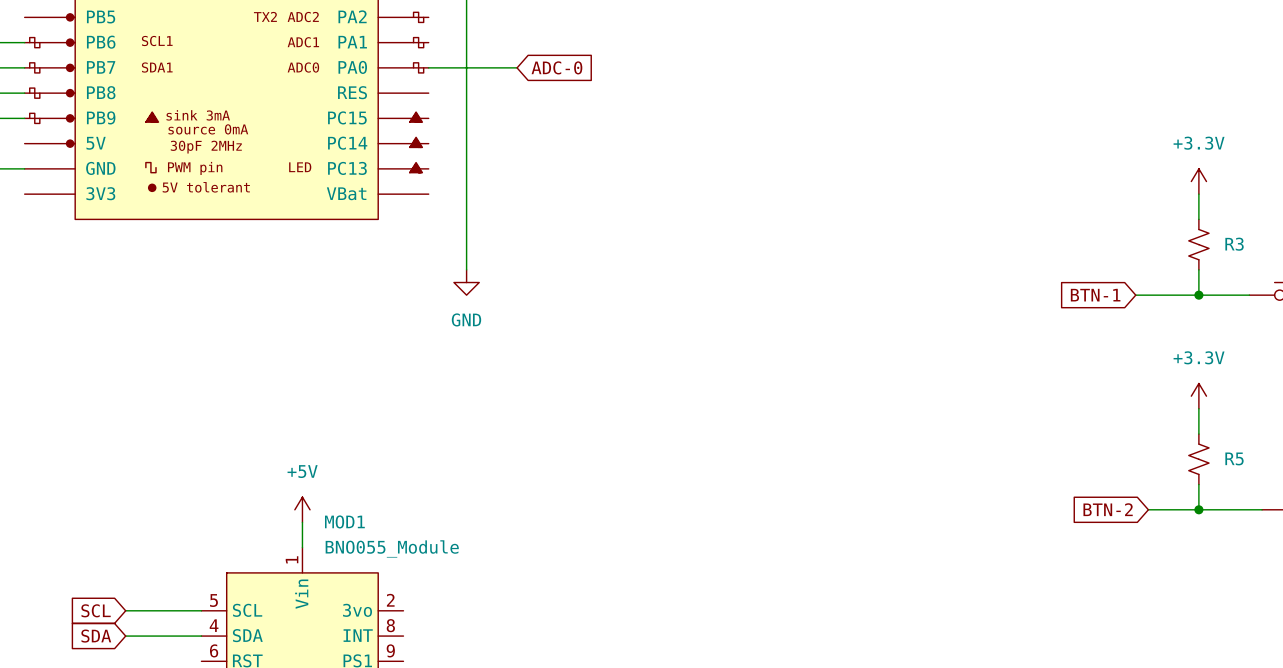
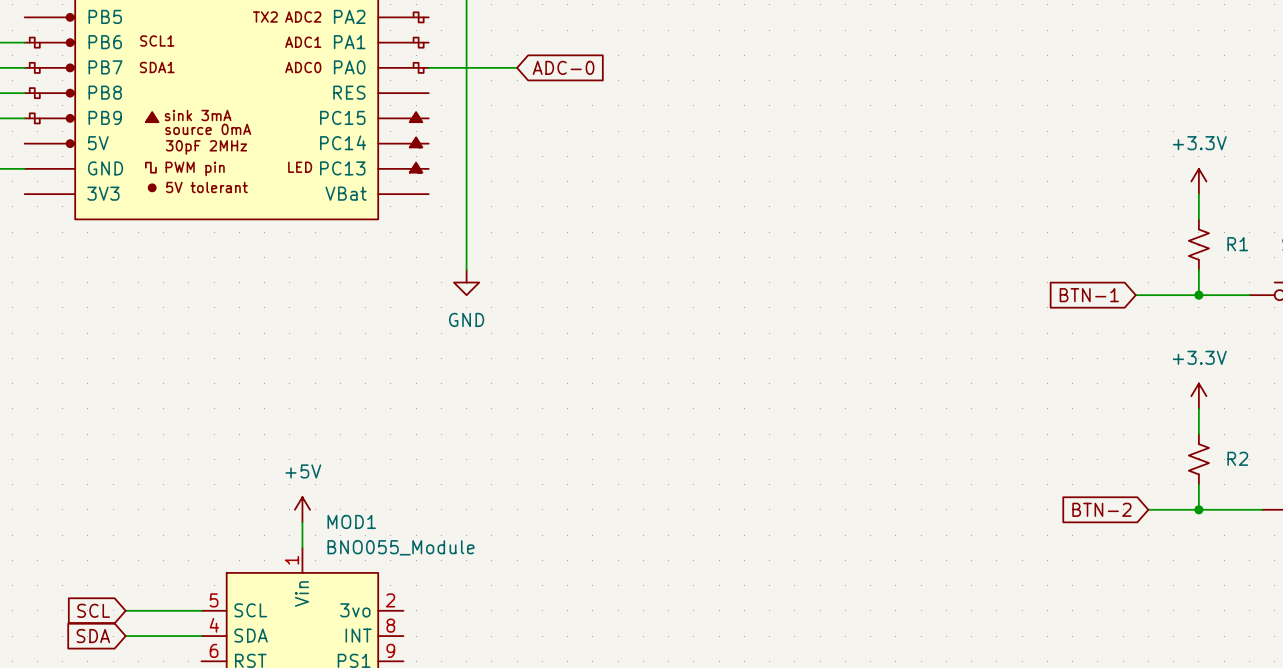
R3 name: R3 (1234, 244) -> R1 (1237, 244)
R5 name: R5 (1234, 458) -> R2 (1237, 458)

